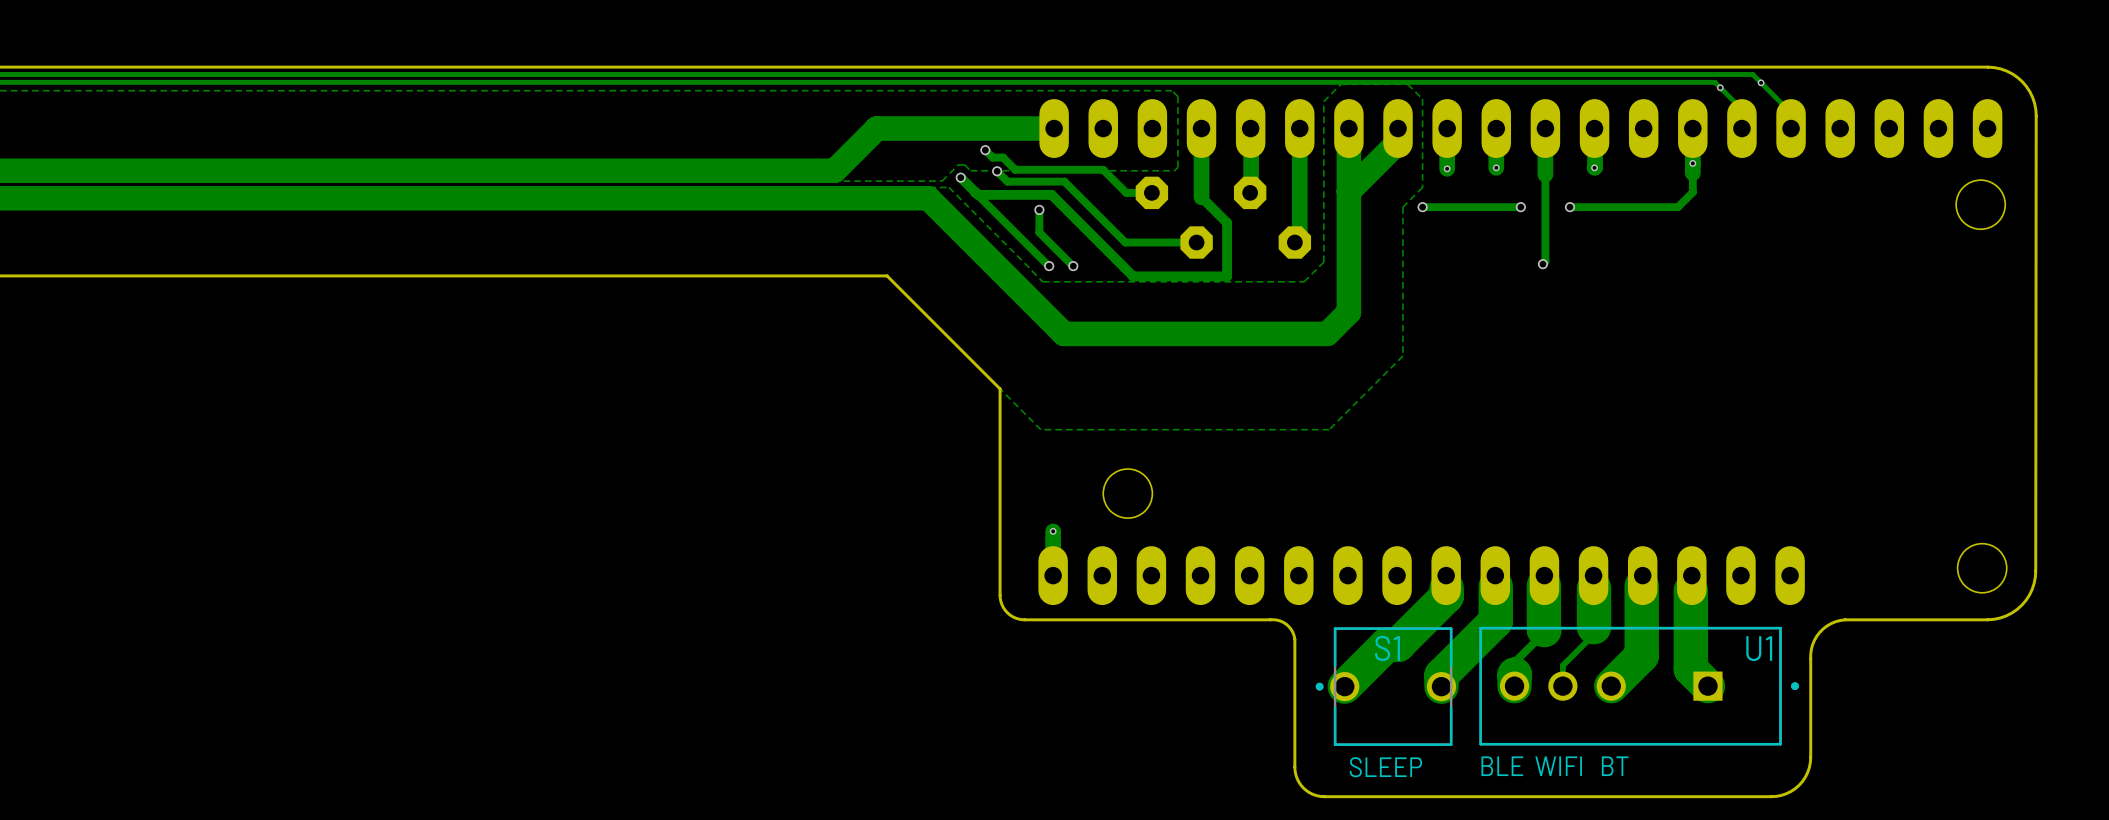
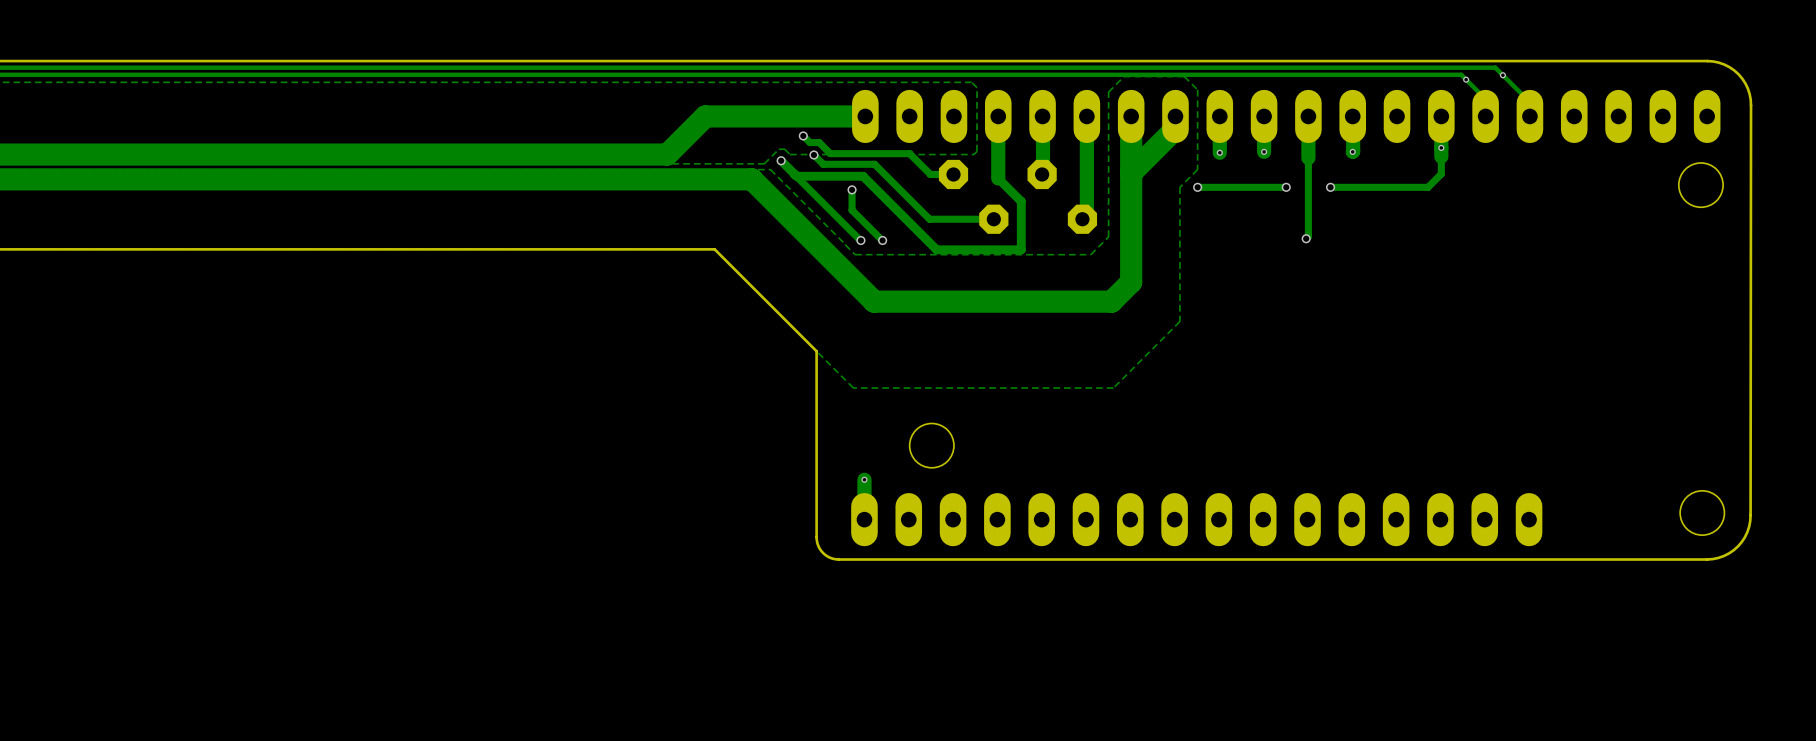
track: (1543, 585) (1544, 632) (1514, 662) (1514, 686) -> none
track: (1641, 585) (1641, 655) (1611, 686) -> none
track: (1495, 586) (1495, 621) (1441, 675) (1441, 686) -> none
track: (1446, 587) (1446, 596) (1398, 644) (1386, 644) (1344, 686) -> none
track: (1594, 587) (1594, 634) (1562, 665) (1562, 686) -> none
track: (1690, 590) (1690, 669) (1707, 686) -> none
board edge: (1845, 619) (1831, 623) (1823, 628) (1816, 636) (1811, 649) (1810, 757) (1807, 772) (1802, 781) (1791, 791) (1771, 796) (1324, 796) (1313, 794) (1300, 785) (1295, 771) (1294, 636) (1290, 628) (1284, 622) (1270, 619) -> (1578, 559) (1060, 559)
S1: (1385, 686) -> none
U1: (1639, 686) -> none
text: BLE WIFI BT (1555, 766) -> none
text: SLEEP (1385, 767) -> none

